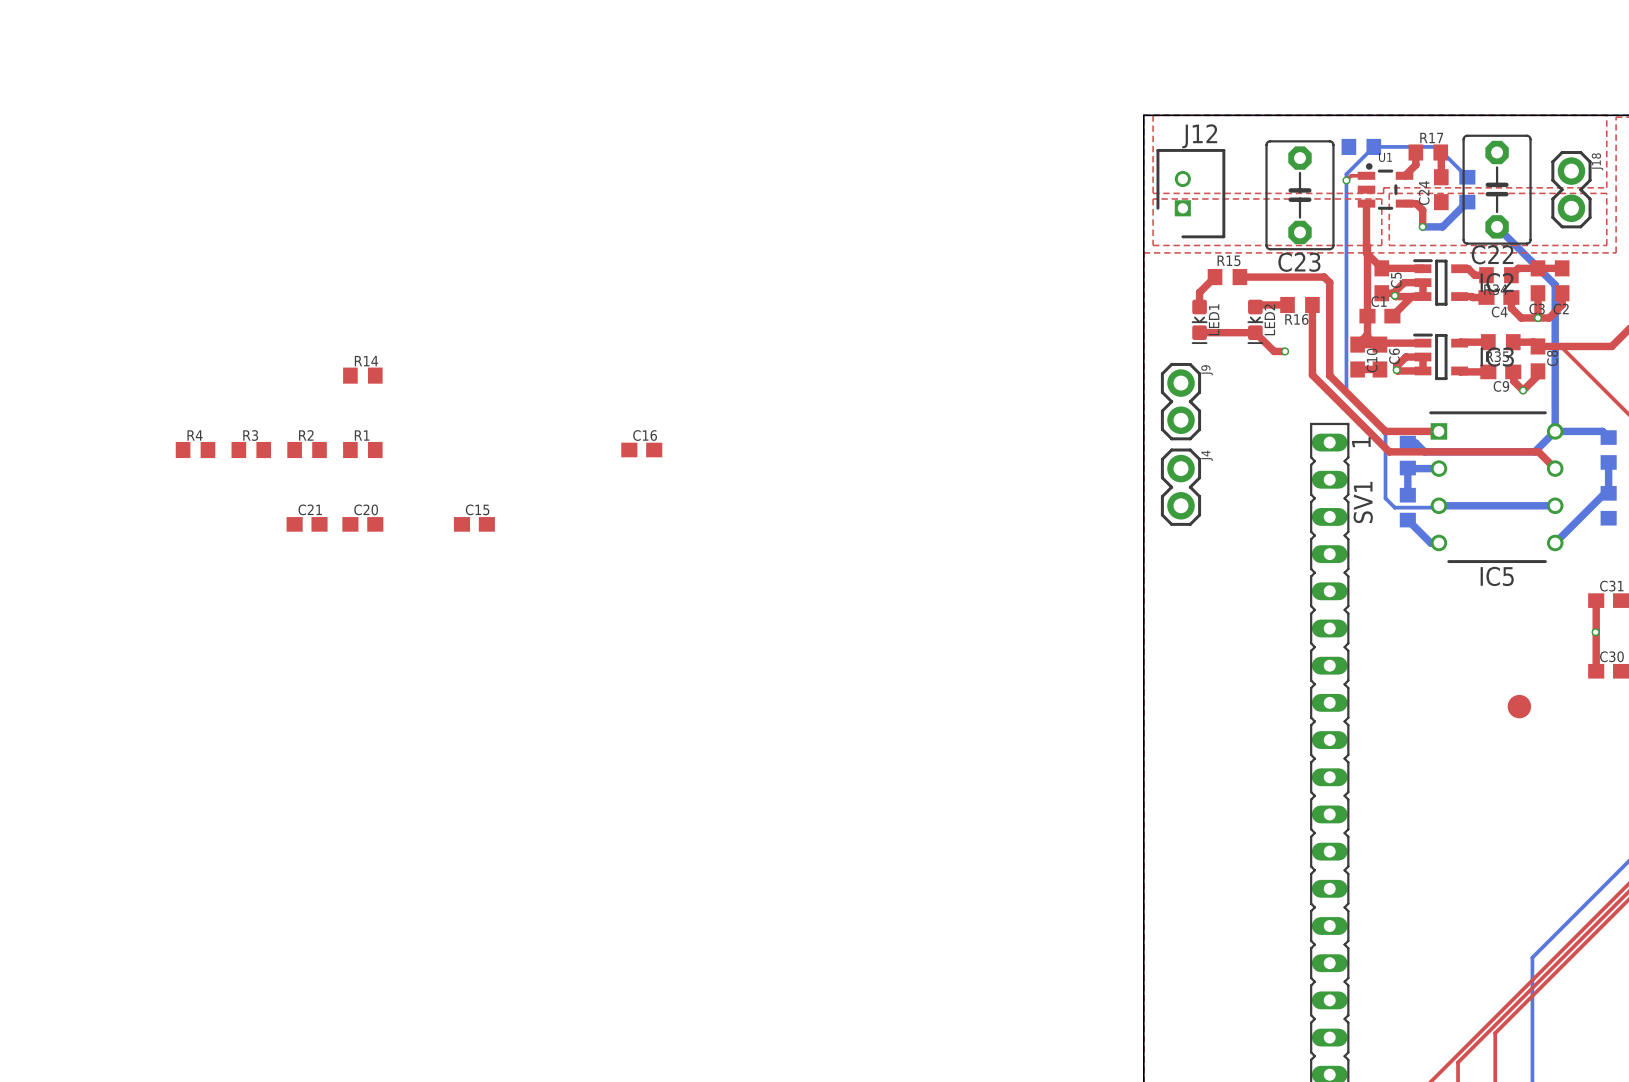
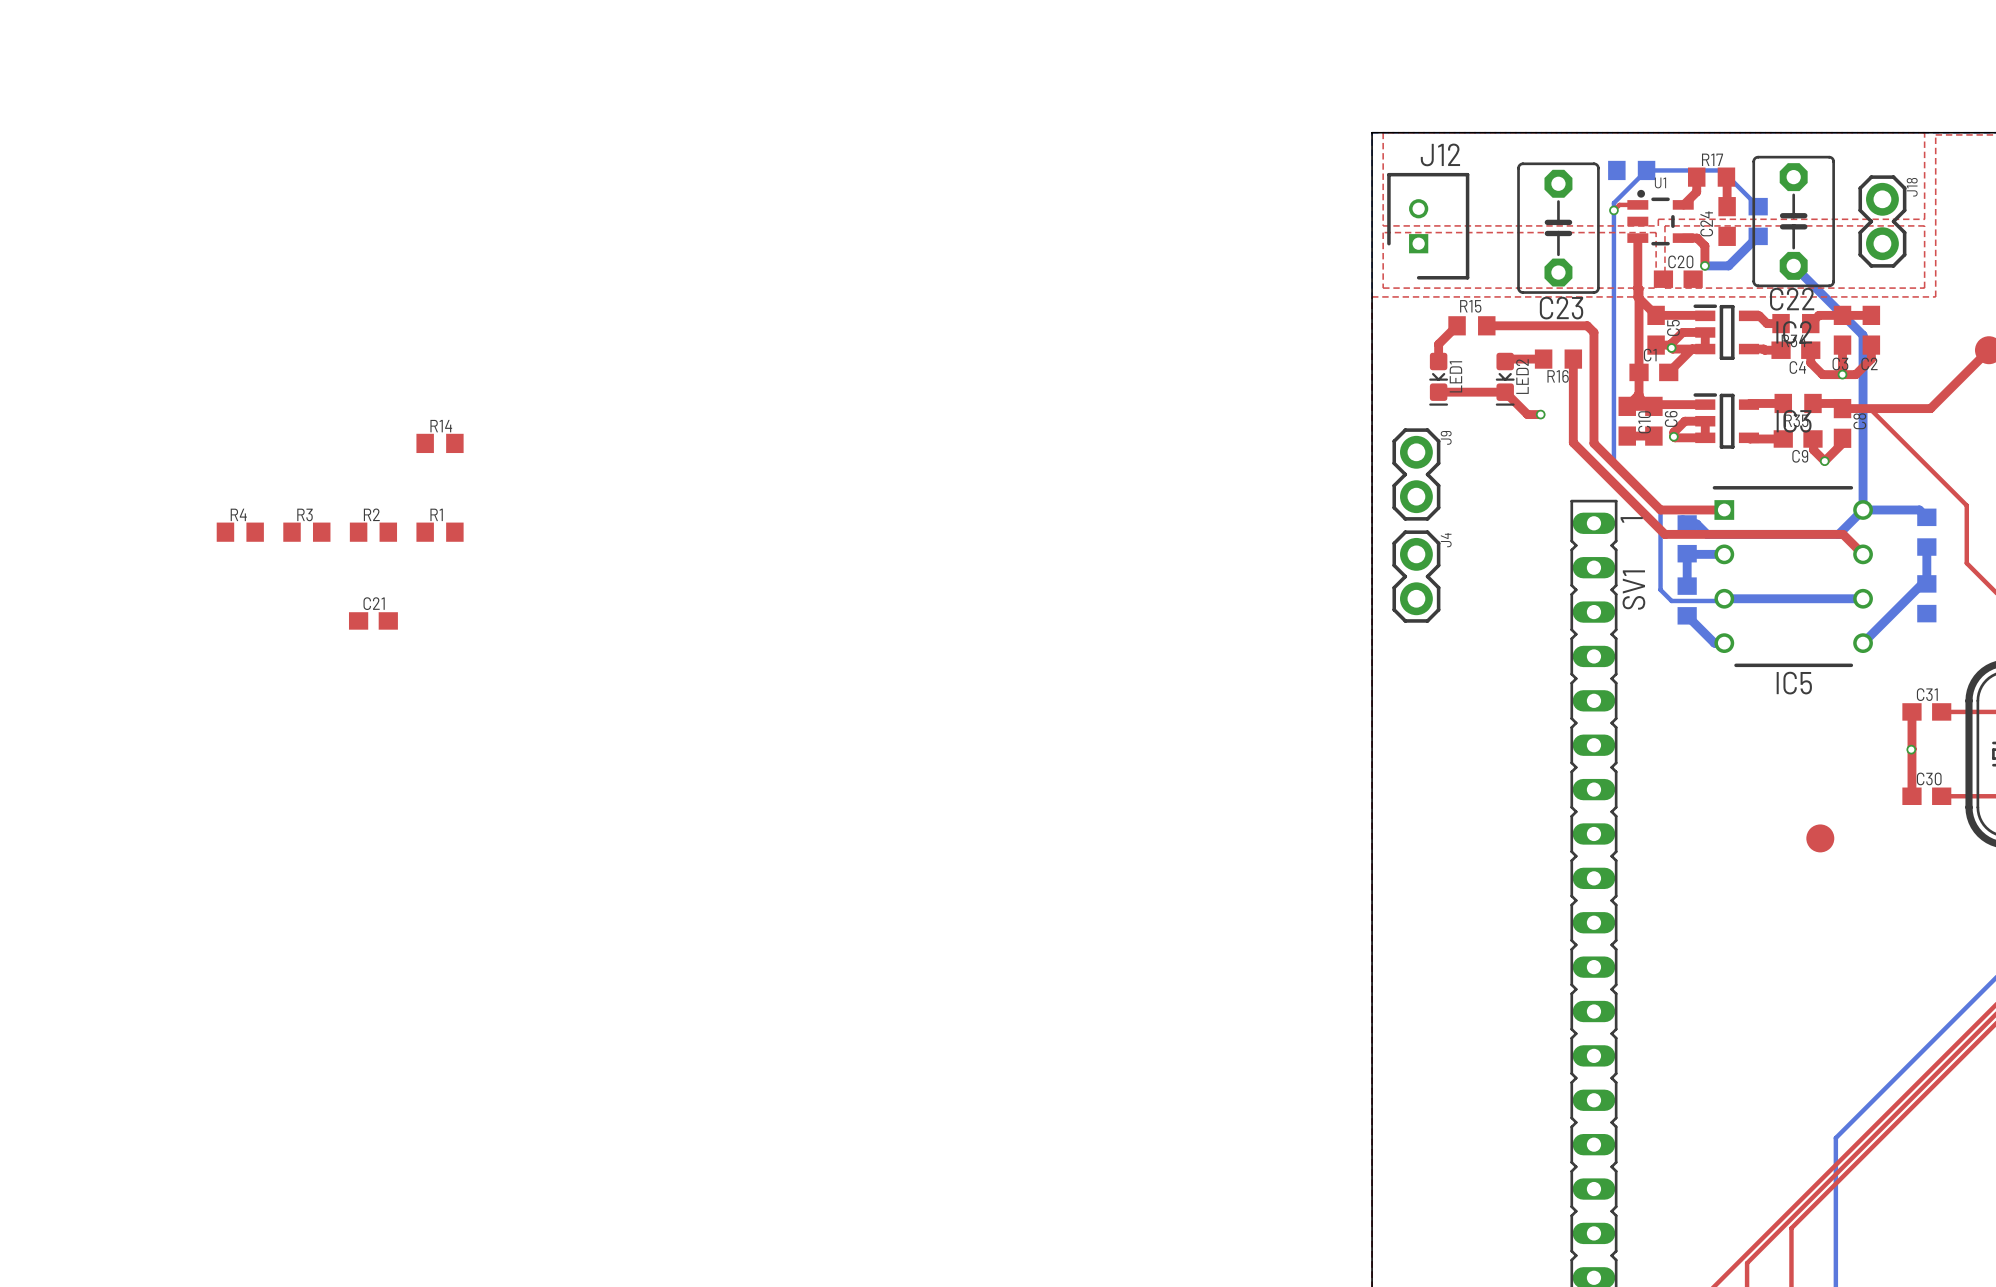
C16: (641, 450) -> none
C20 position: (362, 524) -> (1678, 279)
C15: (474, 524) -> none

